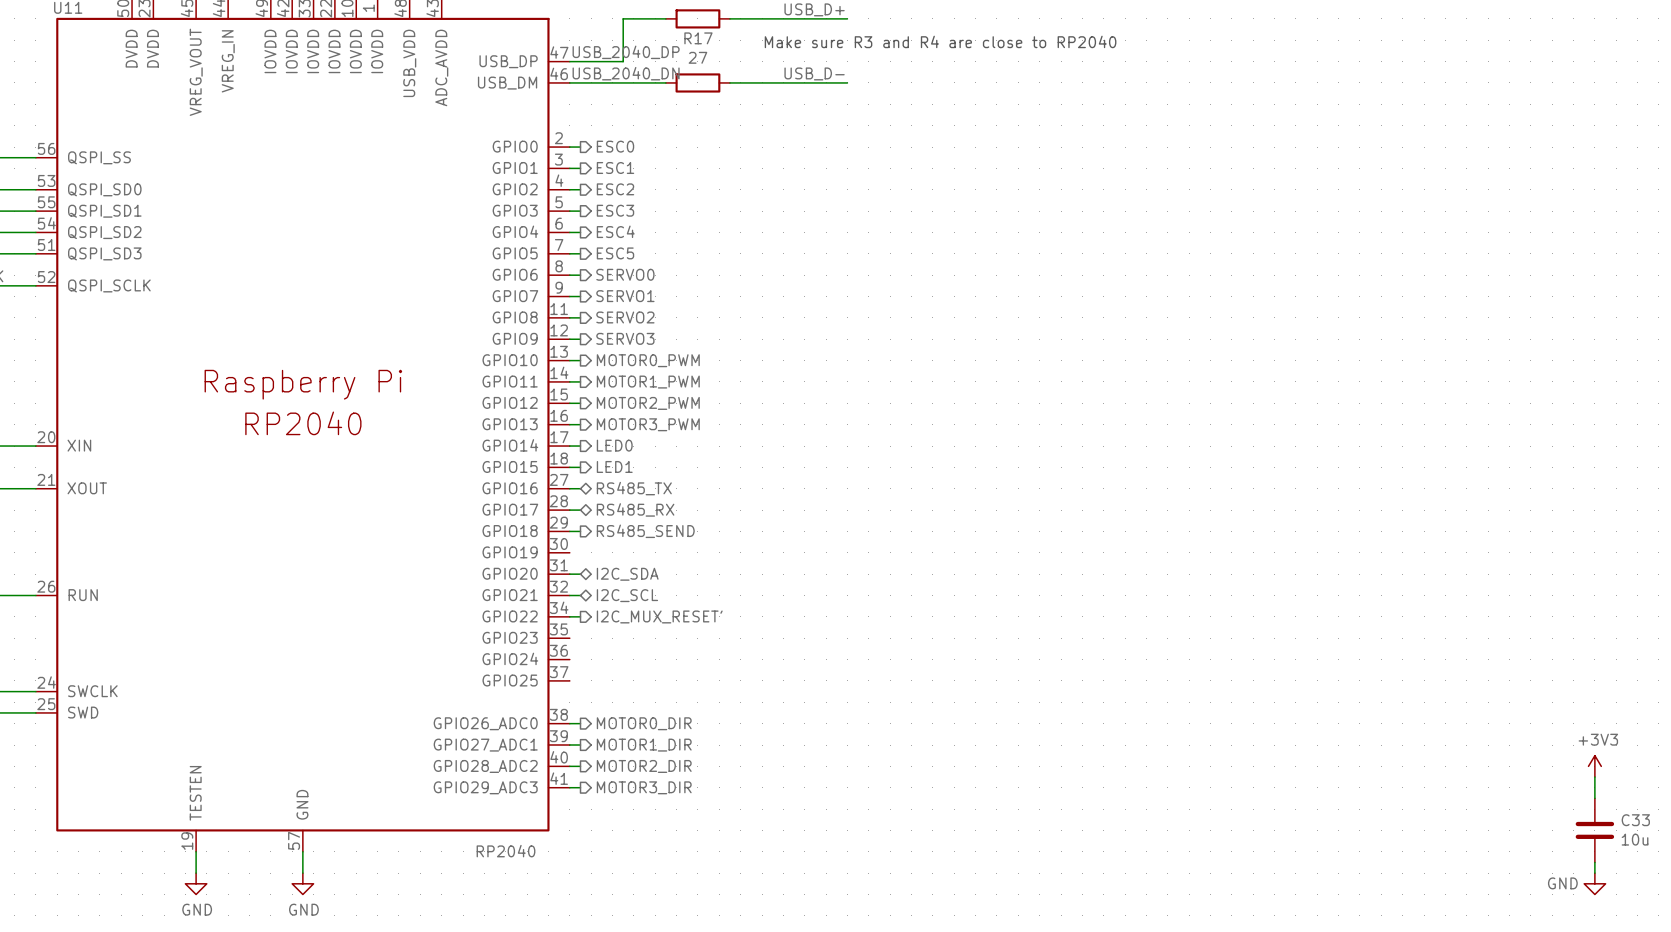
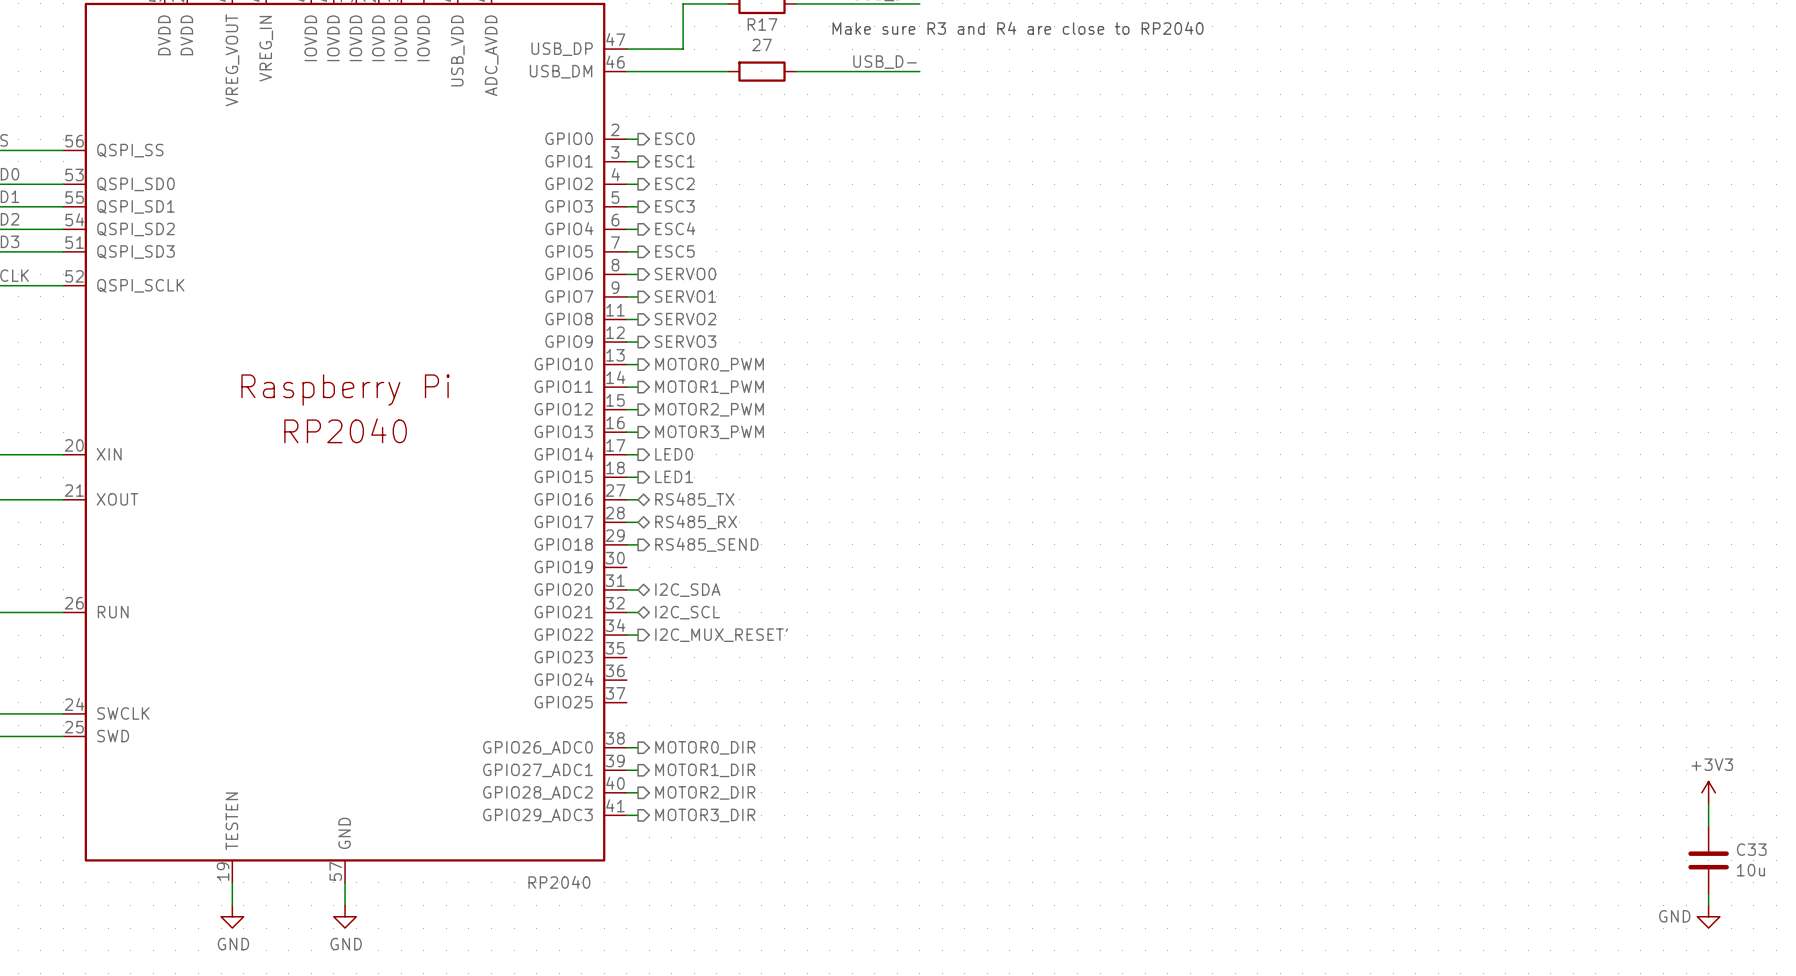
label: USB_2040_DP (626, 52) -> none
label: USB_2040_DN (626, 73) -> none

